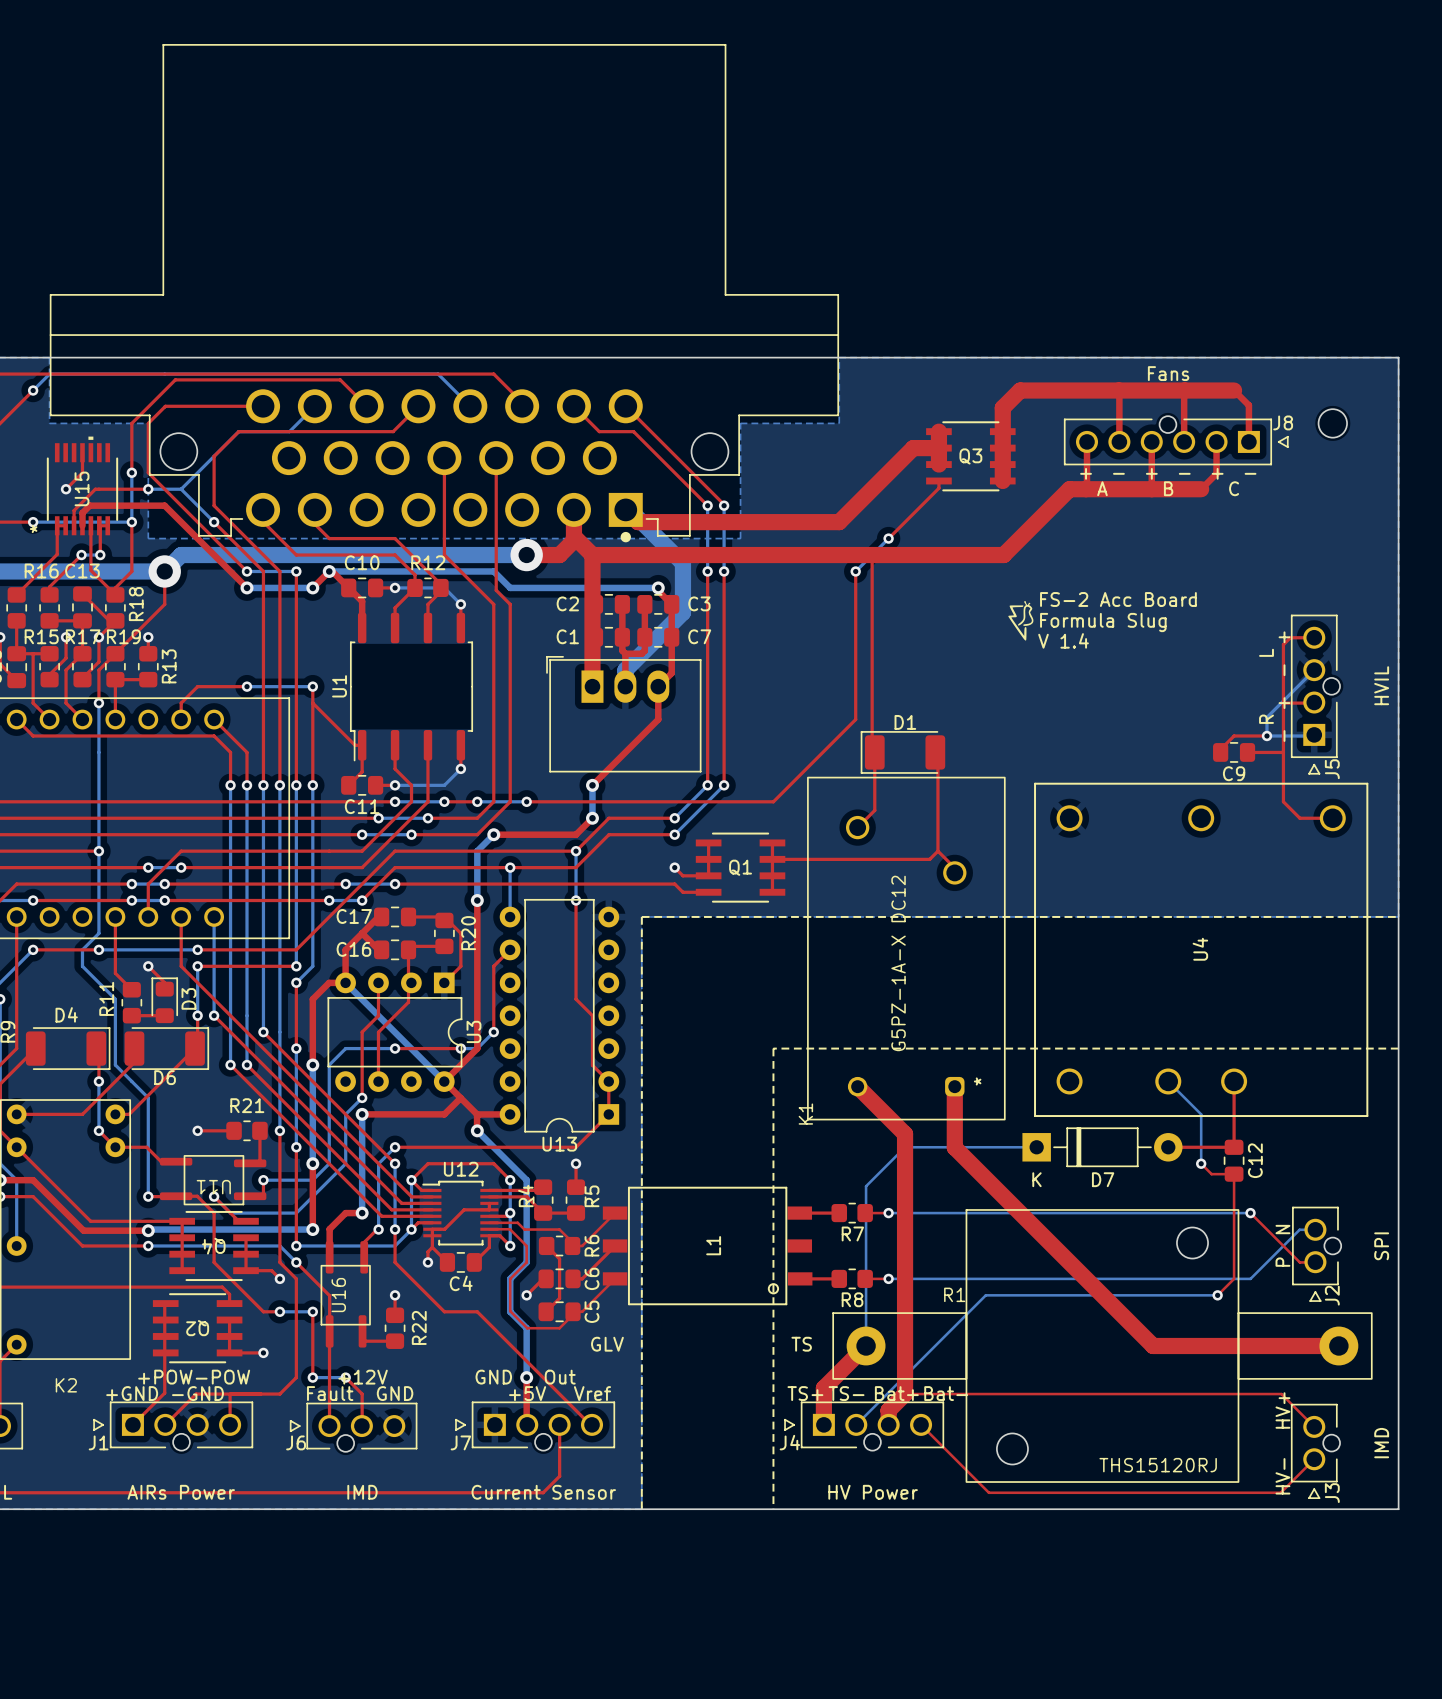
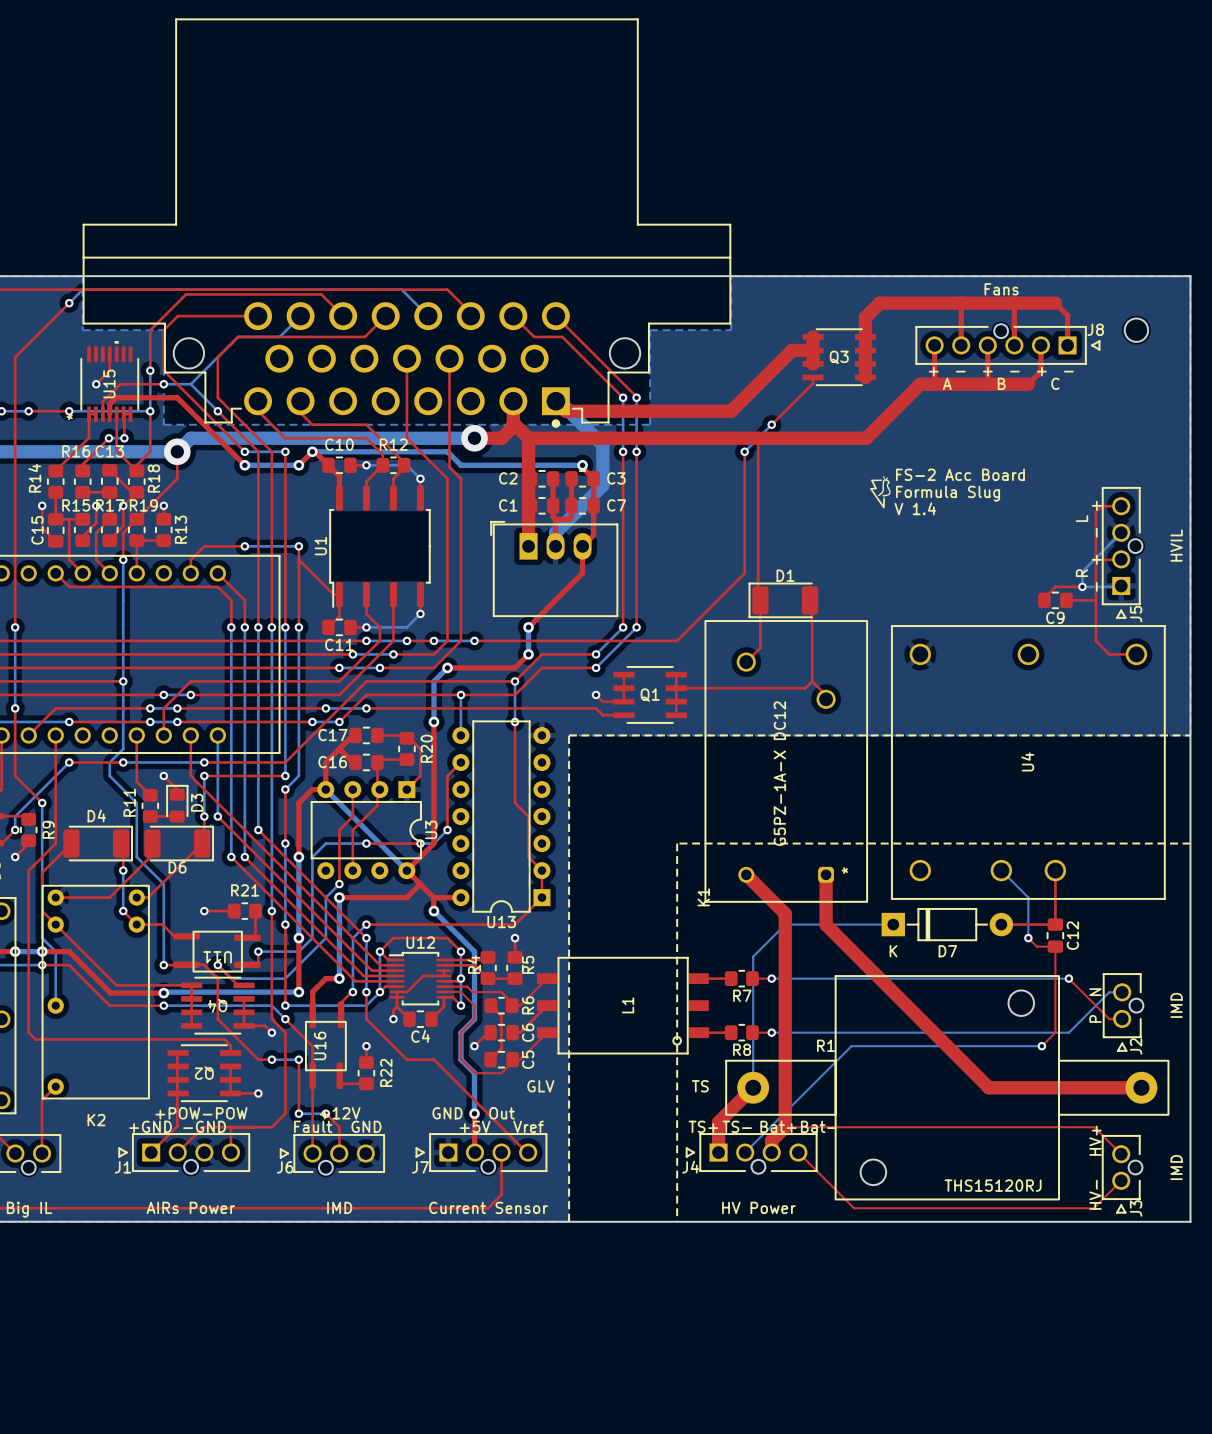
text: SPI (1381, 1246) -> IMD (1176, 1005)

